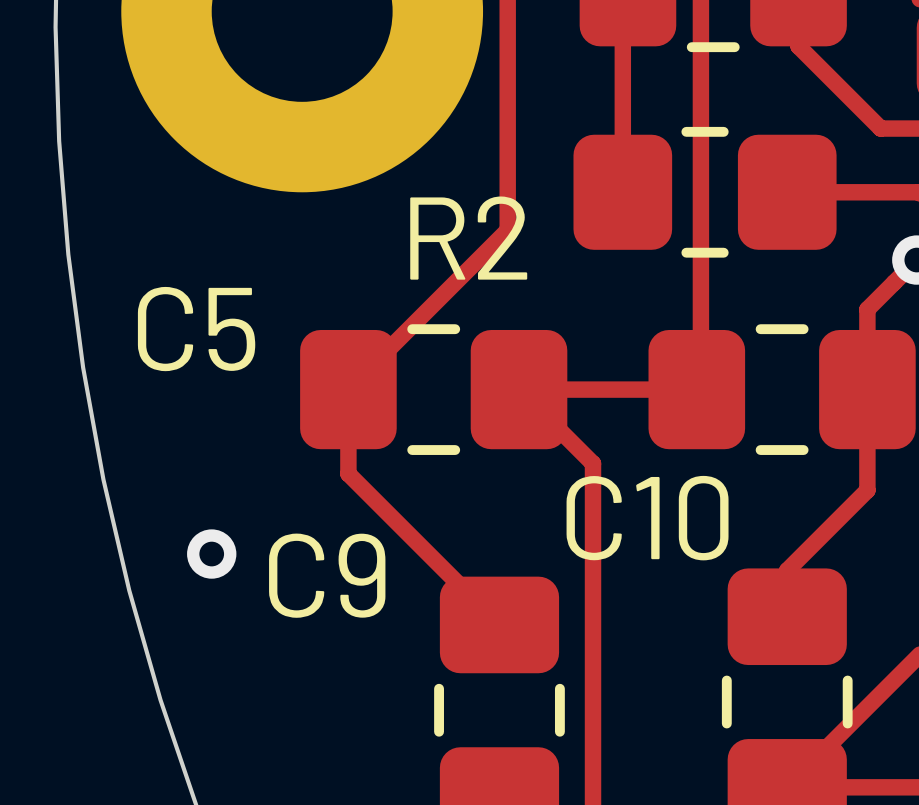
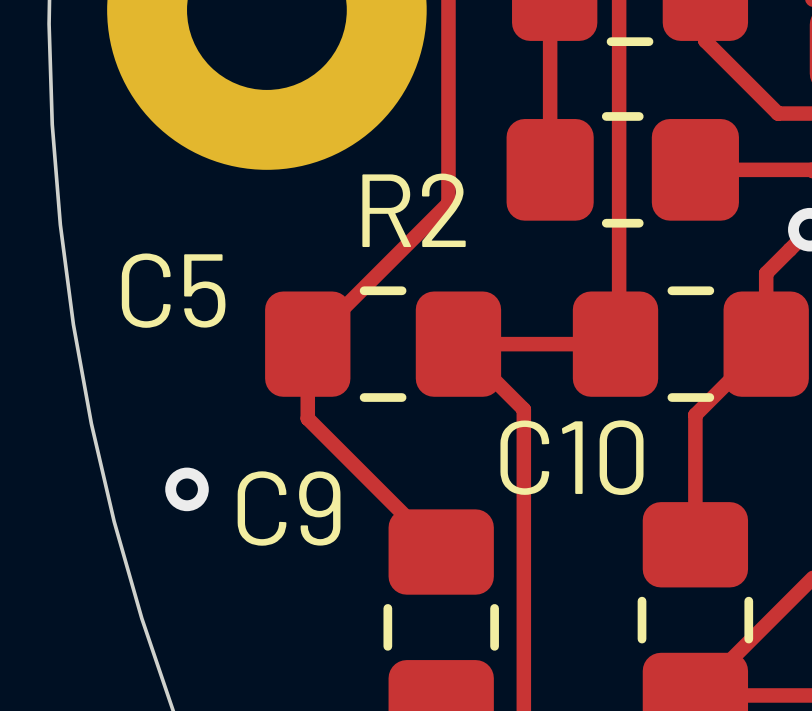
track: (867, 389) (867, 490) (787, 570) -> (766, 344) (695, 414) (695, 503)

